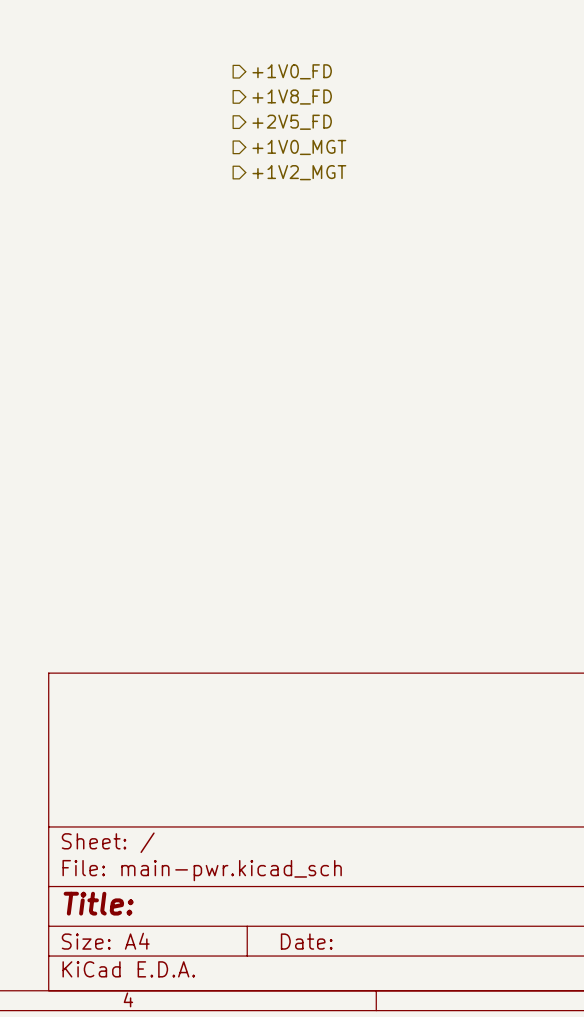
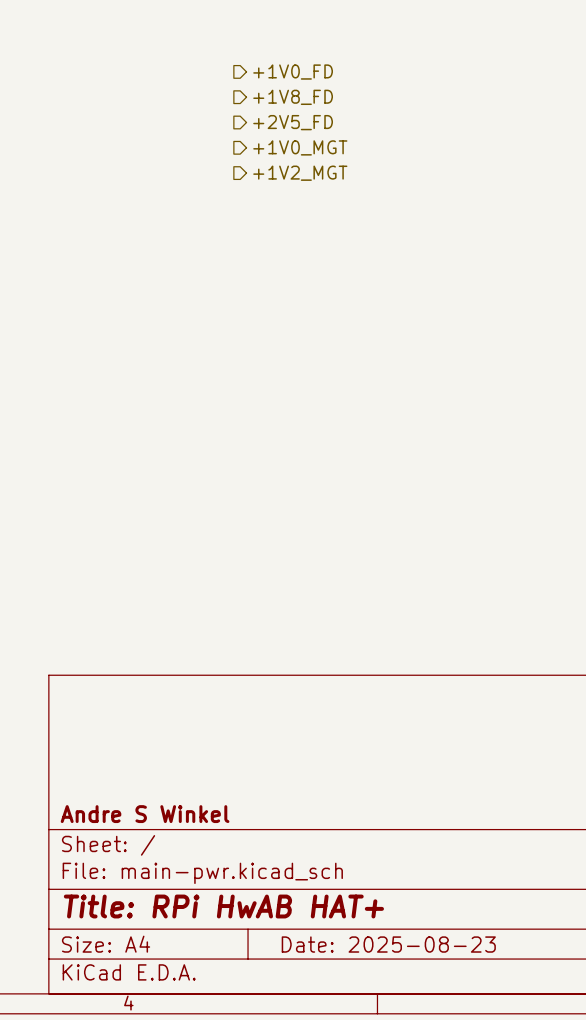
title block: none -> Andre S Winkel (145, 814)
title block: Title: (98, 903) -> Title: RPi HwAB HAT+ (223, 906)
title block: Date: (306, 941) -> Date: 2025-08-23 (388, 944)

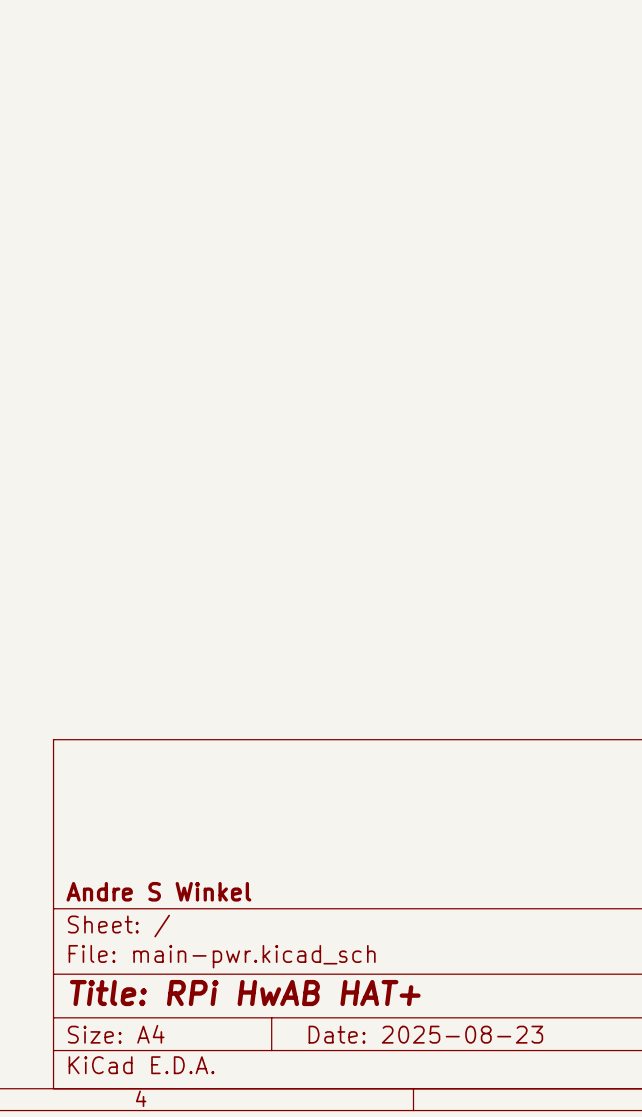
hierarchical label: +1V0_FD (293, 72) -> none
hierarchical label: +1V8_FD (293, 97) -> none
hierarchical label: +2V5_FD (293, 122) -> none
hierarchical label: +1V0_MGT (300, 147) -> none
hierarchical label: +1V2_MGT (300, 173) -> none

